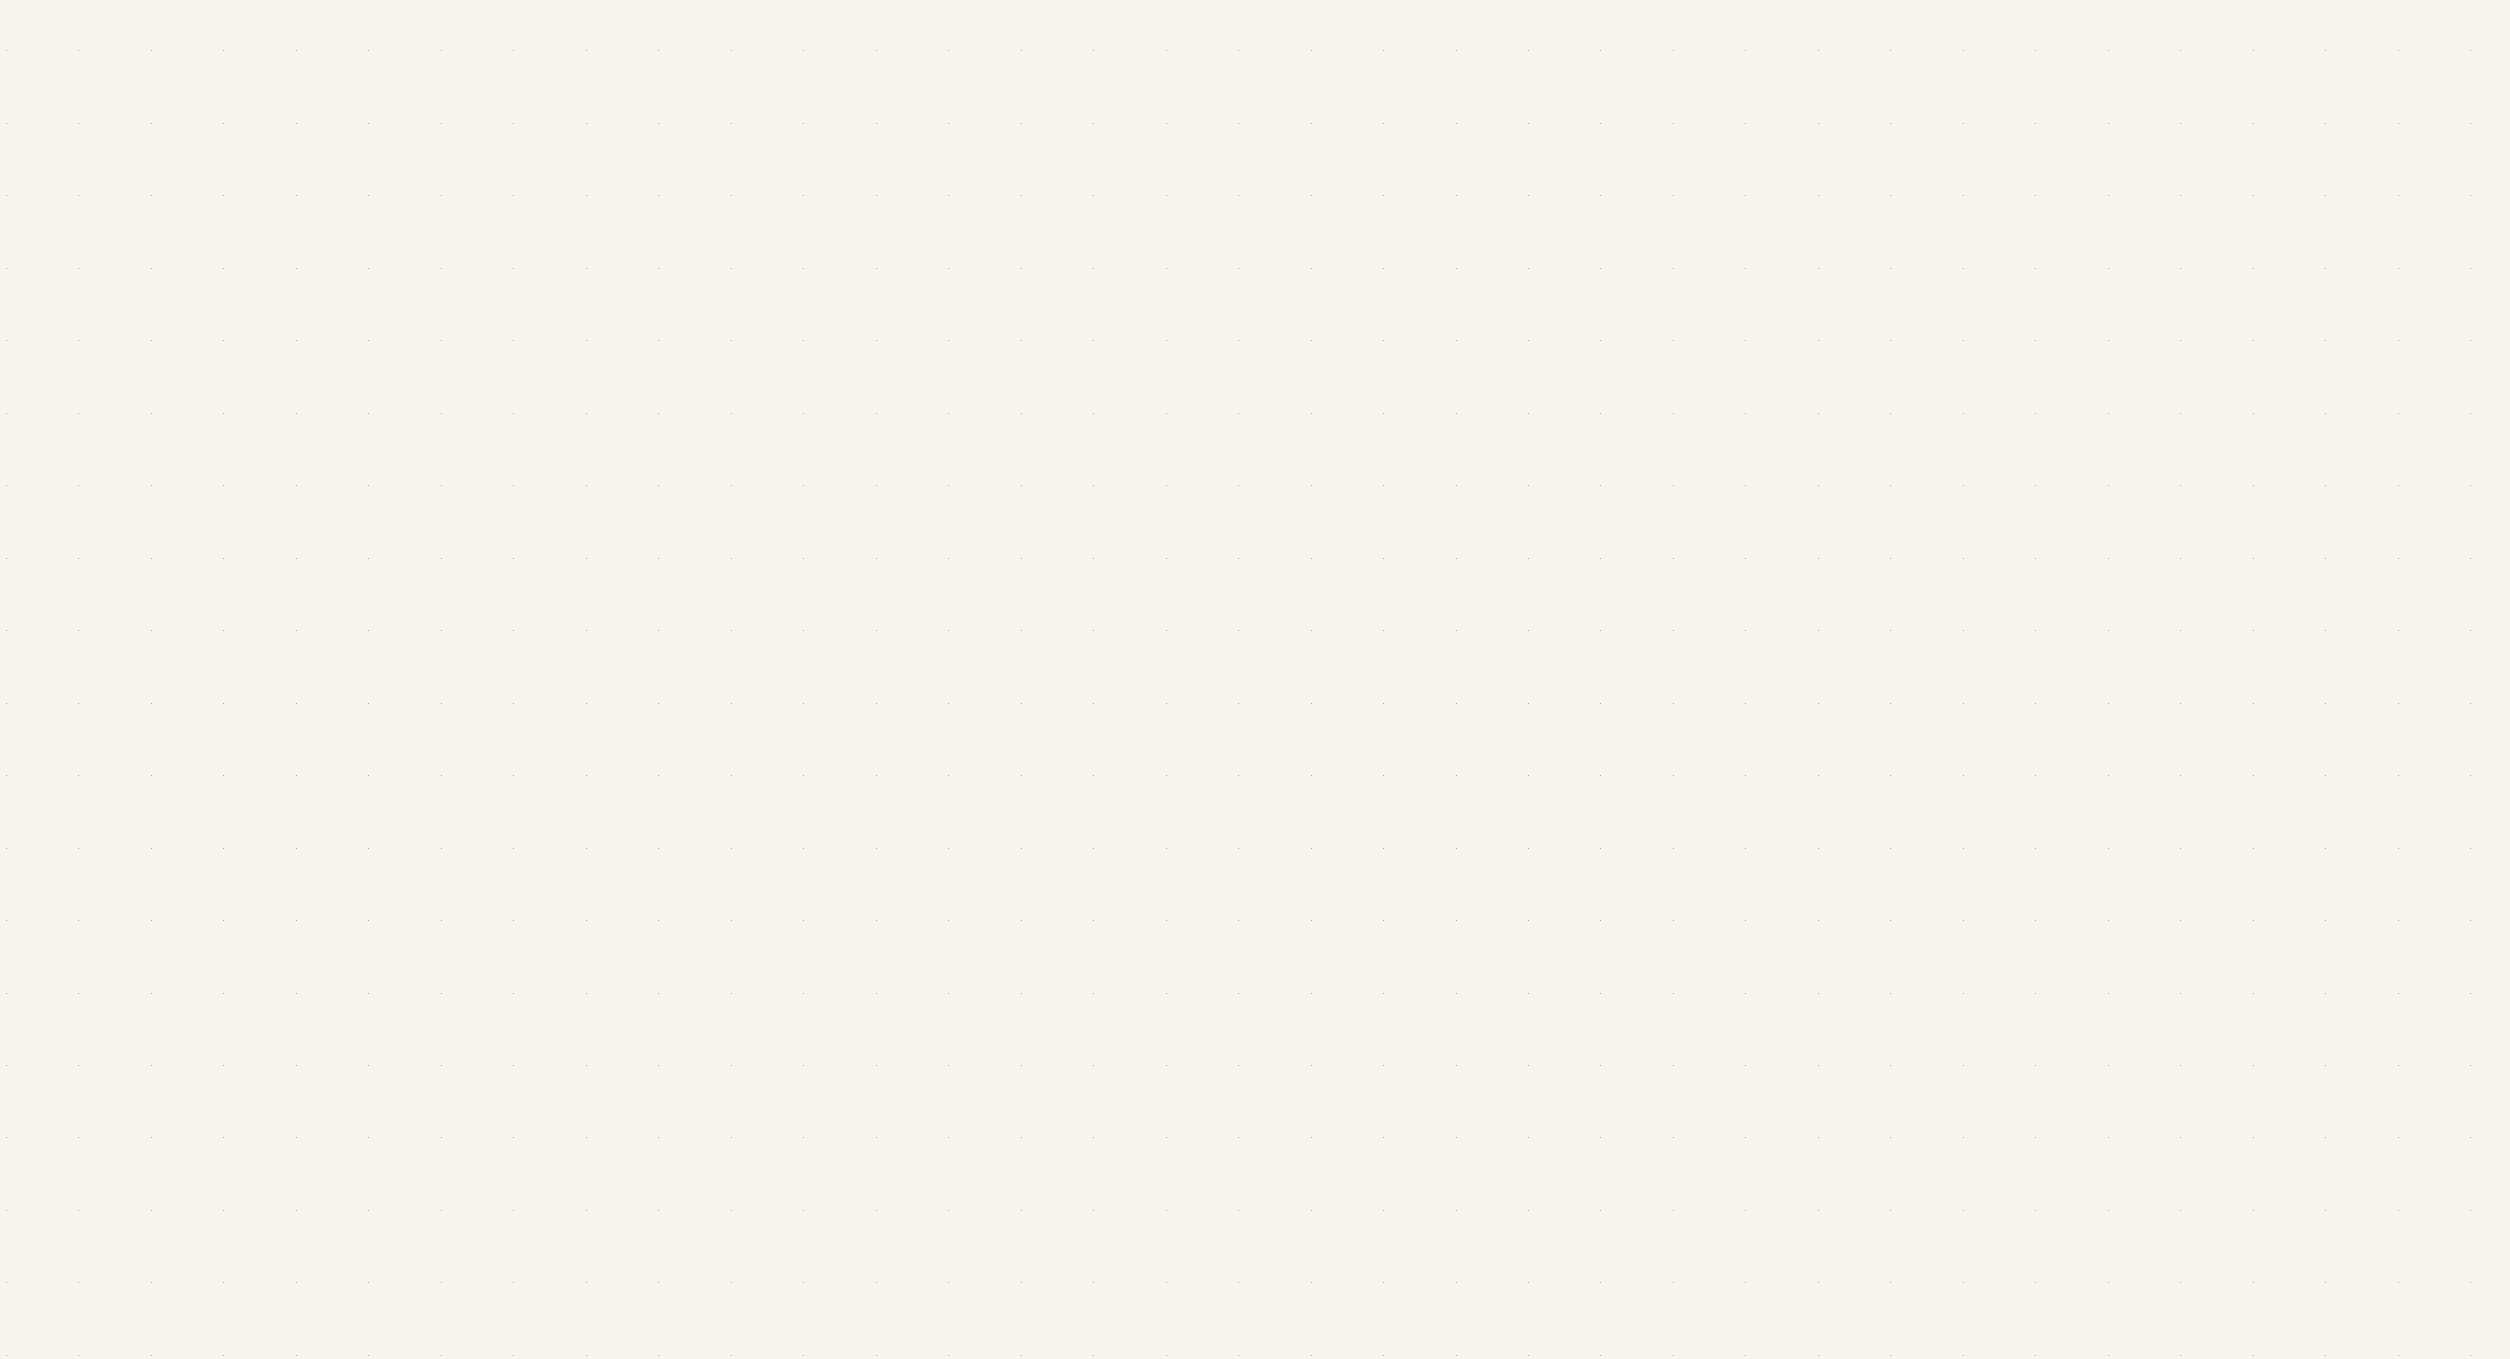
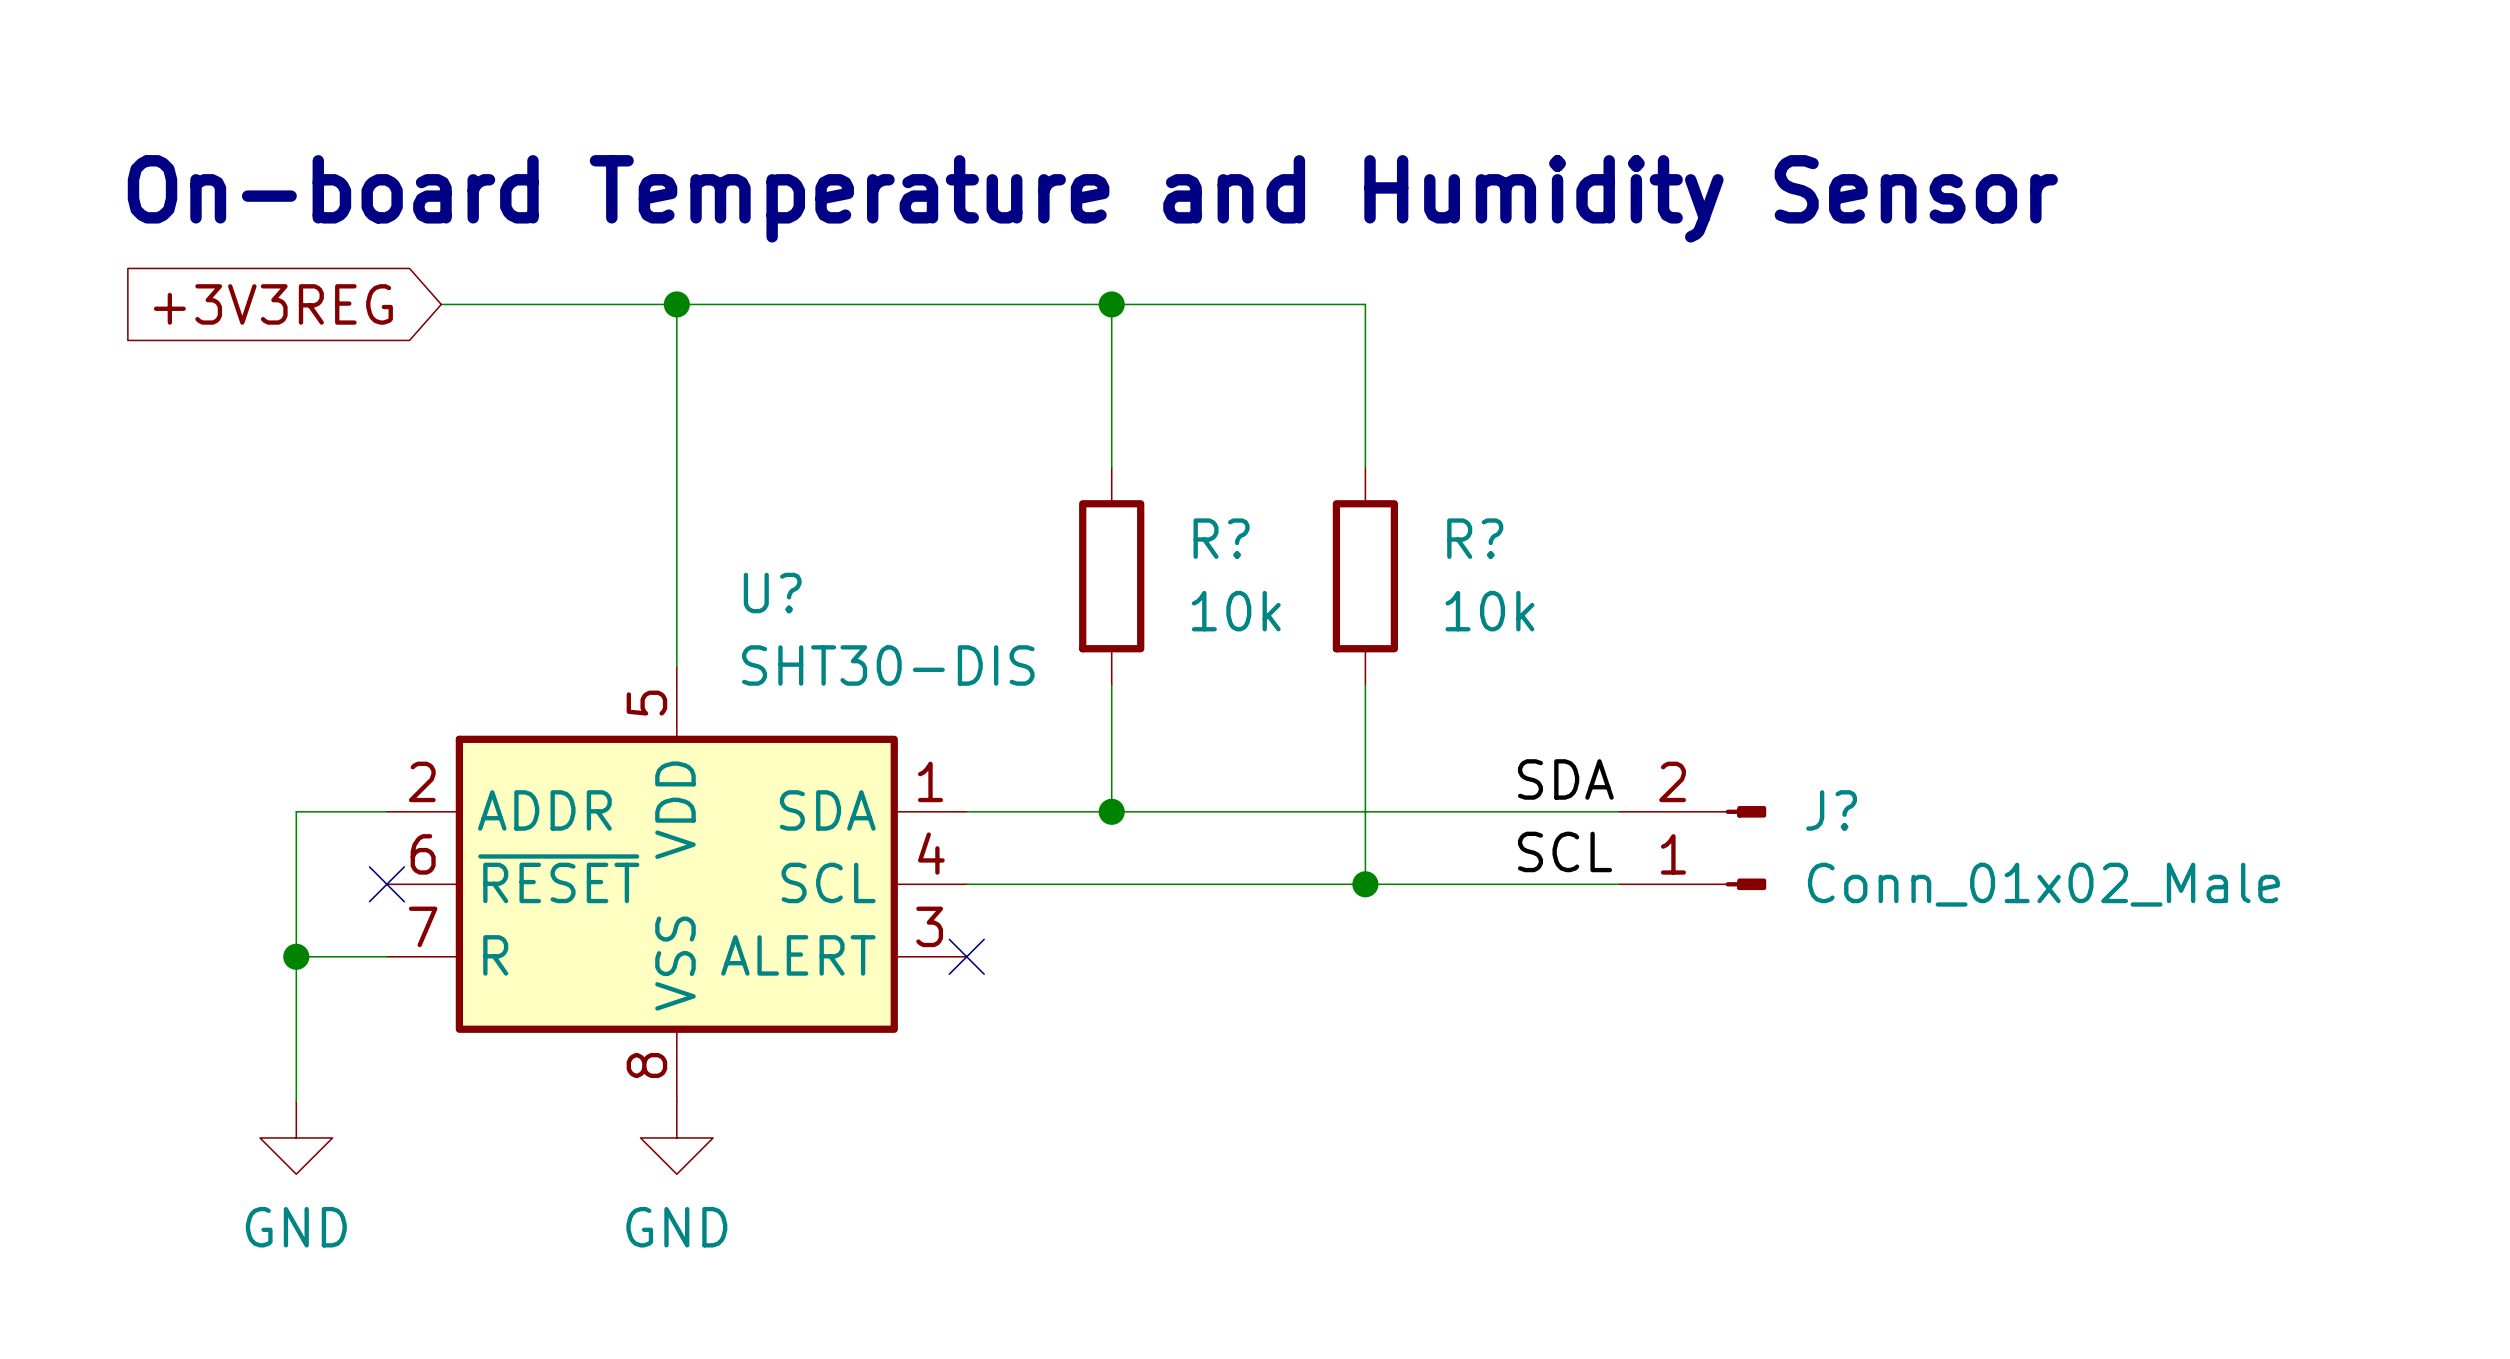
text: none -> On-board Temperature and Humidity Sensor (1092, 198)
global label: none -> +3V3REG (273, 304)
wire: none -> (441, 304) (1365, 304) (1365, 467)
wire: none -> (676, 304) (676, 666)
junction: none -> (676, 304)
wire: none -> (1111, 304) (1111, 467)
junction: none -> (1111, 304)
R?: none -> 10k (1111, 576)
R?: none -> 10k (1365, 576)
wire: none -> (1111, 684) (1111, 811)
wire: none -> (1365, 684) (1365, 884)
label: none -> SDA (1565, 779)
wire: none -> (386, 811) (296, 811) (296, 1101)
wire: none -> (966, 811) (1619, 811)
junction: none -> (1111, 811)
J?: none -> Conn_01x02_Male (1692, 848)
label: none -> SCL (1564, 851)
no-connect mark: none -> (386, 884)
U?: none -> SHT30-DIS (676, 884)
wire: none -> (966, 884) (1619, 884)
junction: none -> (1365, 884)
wire: none -> (296, 956) (386, 956)
junction: none -> (296, 956)
no-connect mark: none -> (966, 956)
power symbol: none -> GND (296, 1137)
power symbol: none -> GND (676, 1137)

